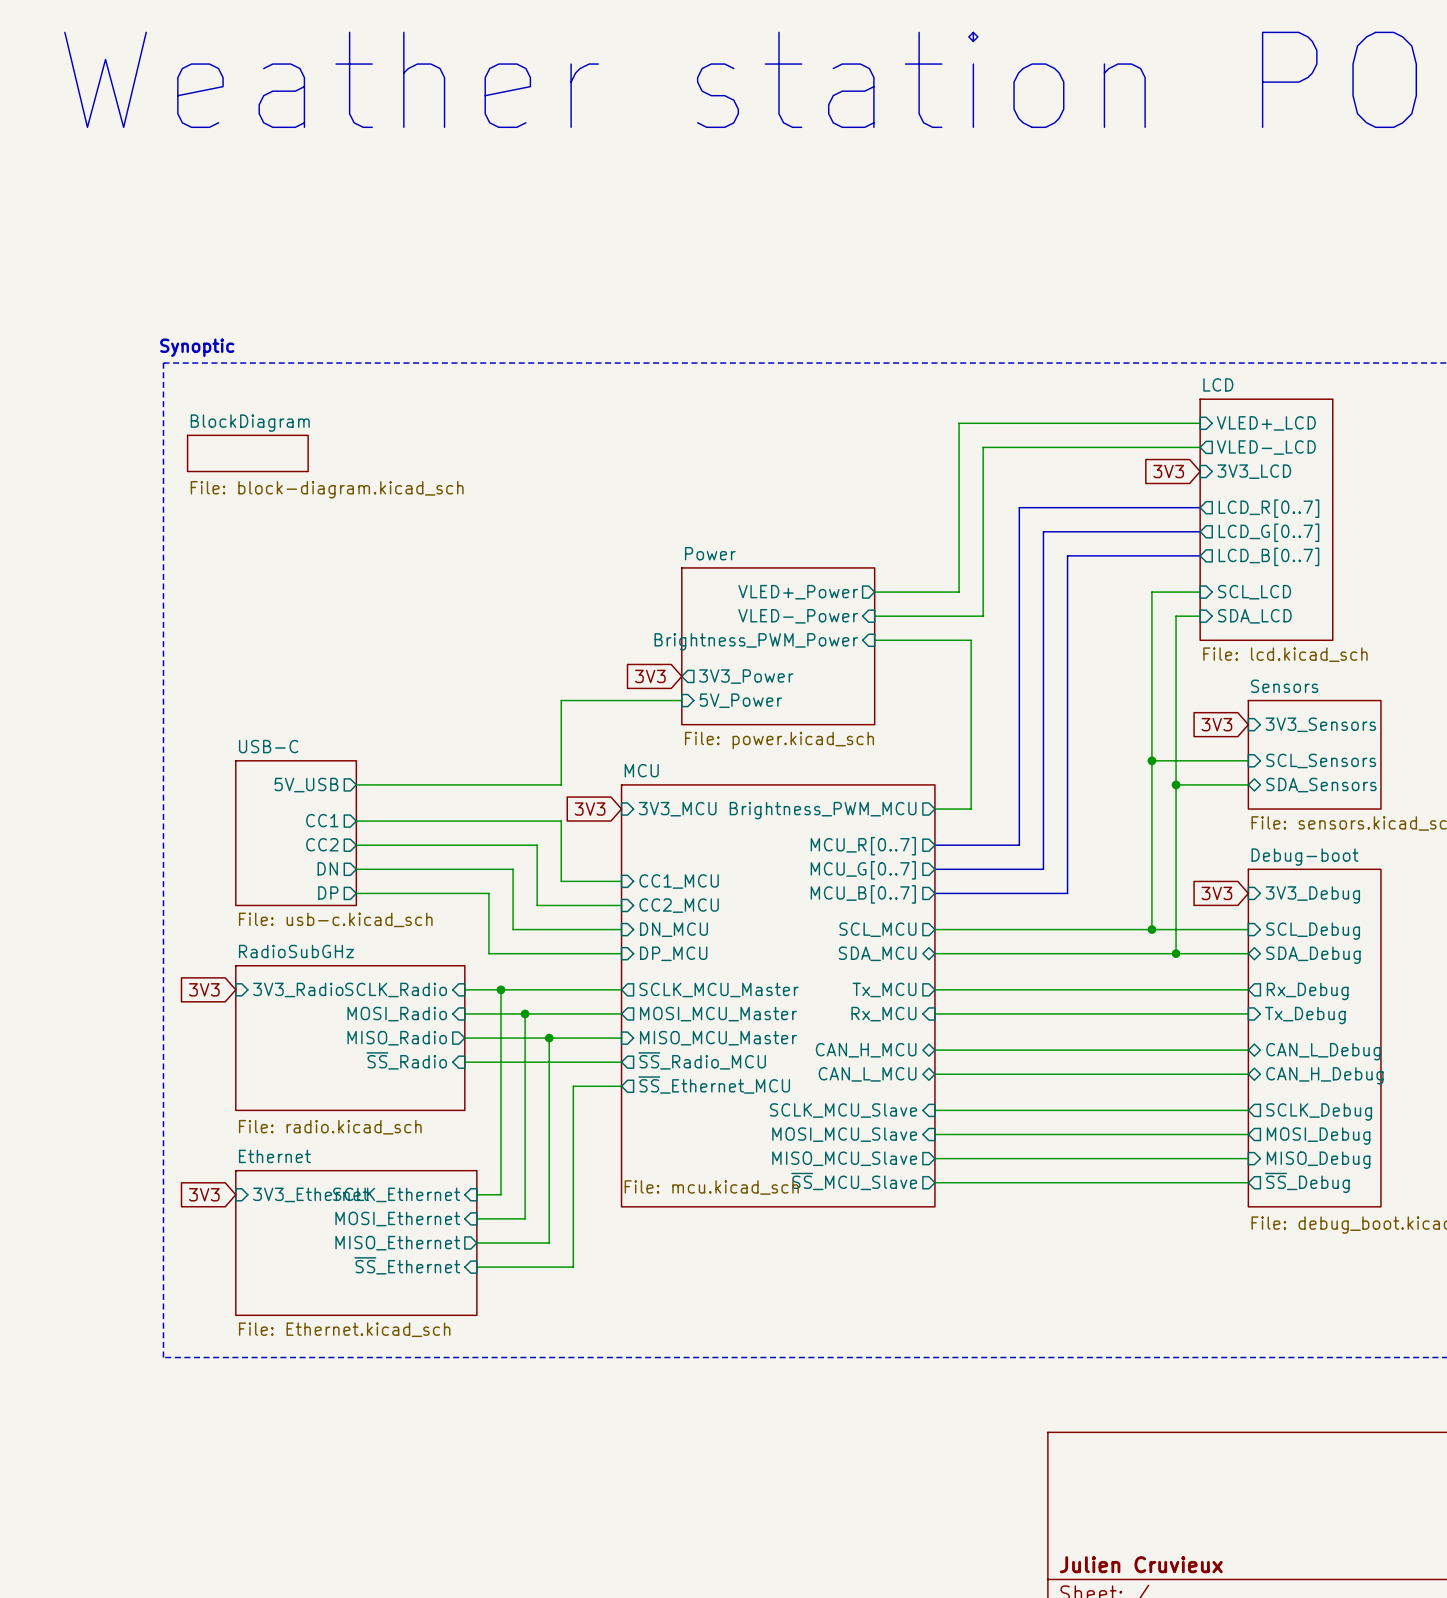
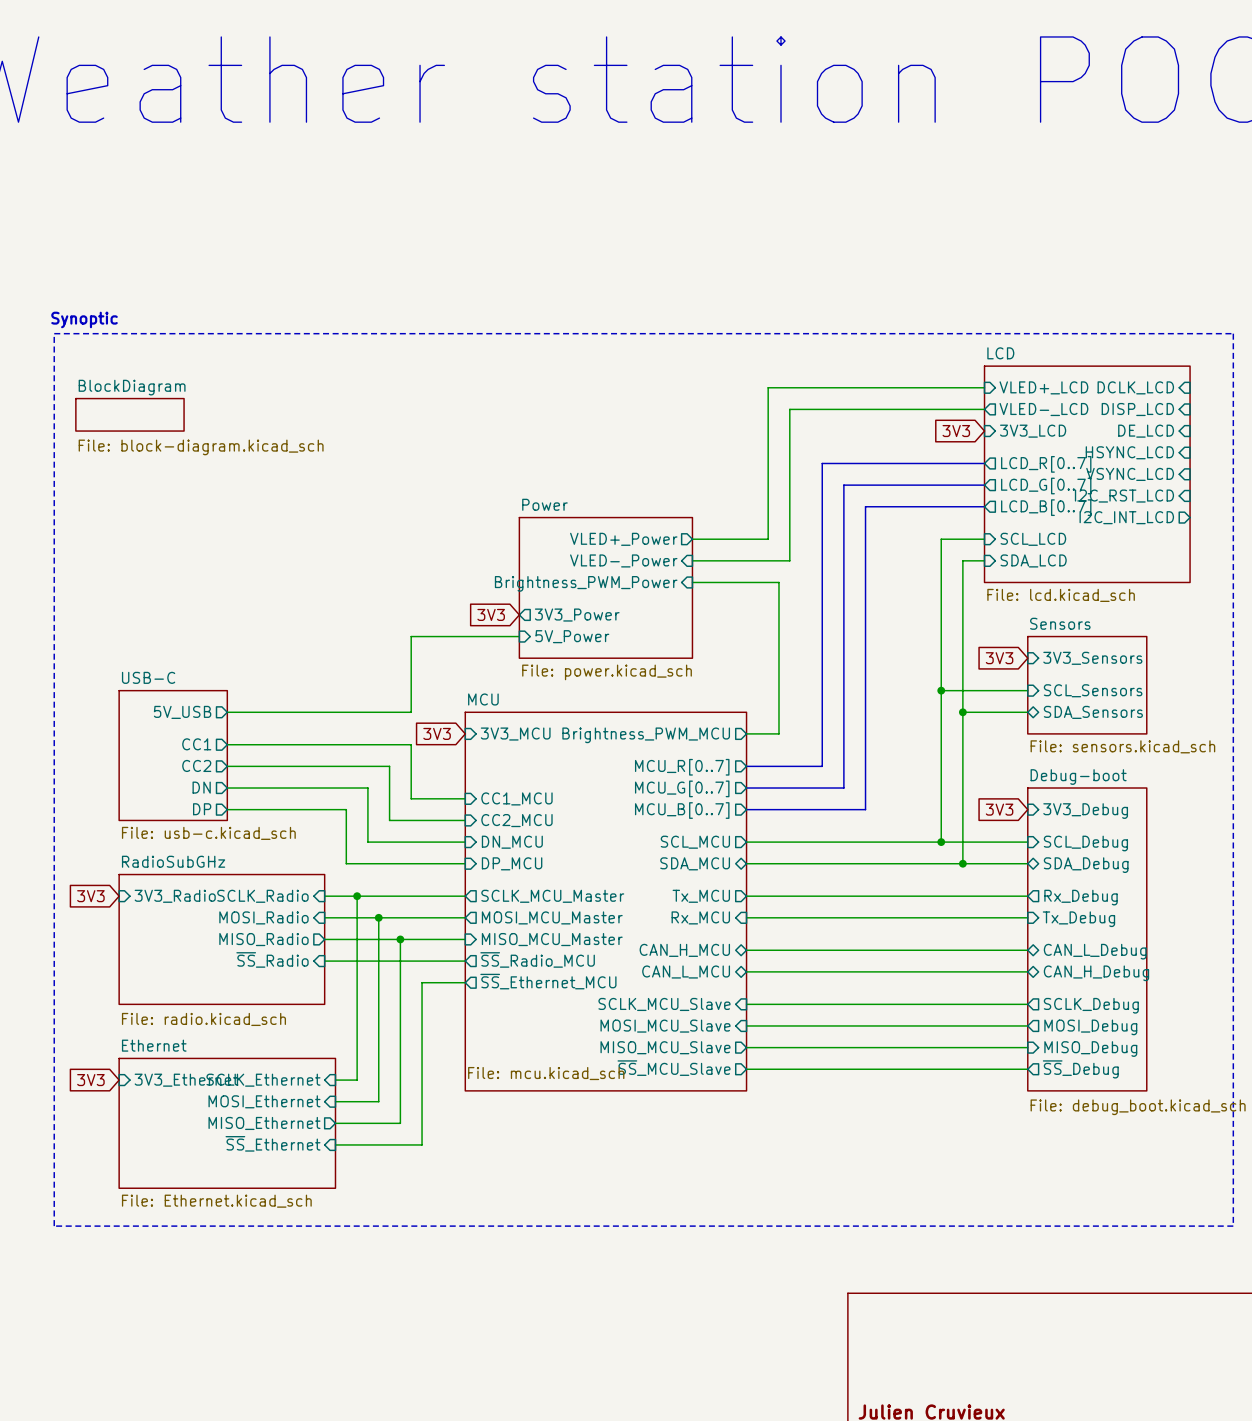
sheet pin: none -> DCLK_LCD (1135, 387)
sheet pin: none -> DISP_LCD (1137, 409)
sheet pin: none -> DE_LCD (1146, 431)
sheet pin: none -> HSYNC_LCD (1129, 452)
sheet LCD: File: lcd.kicad_sch (1266, 519) -> none
sheet LCD: none -> File: lcd.kicad_sch (1087, 474)
sheet pin: none -> VSYNC_LCD (1130, 474)
sheet pin: none -> I2C_RST_LCD (1124, 496)
sheet pin: none -> I2C_INT_LCD (1126, 517)

